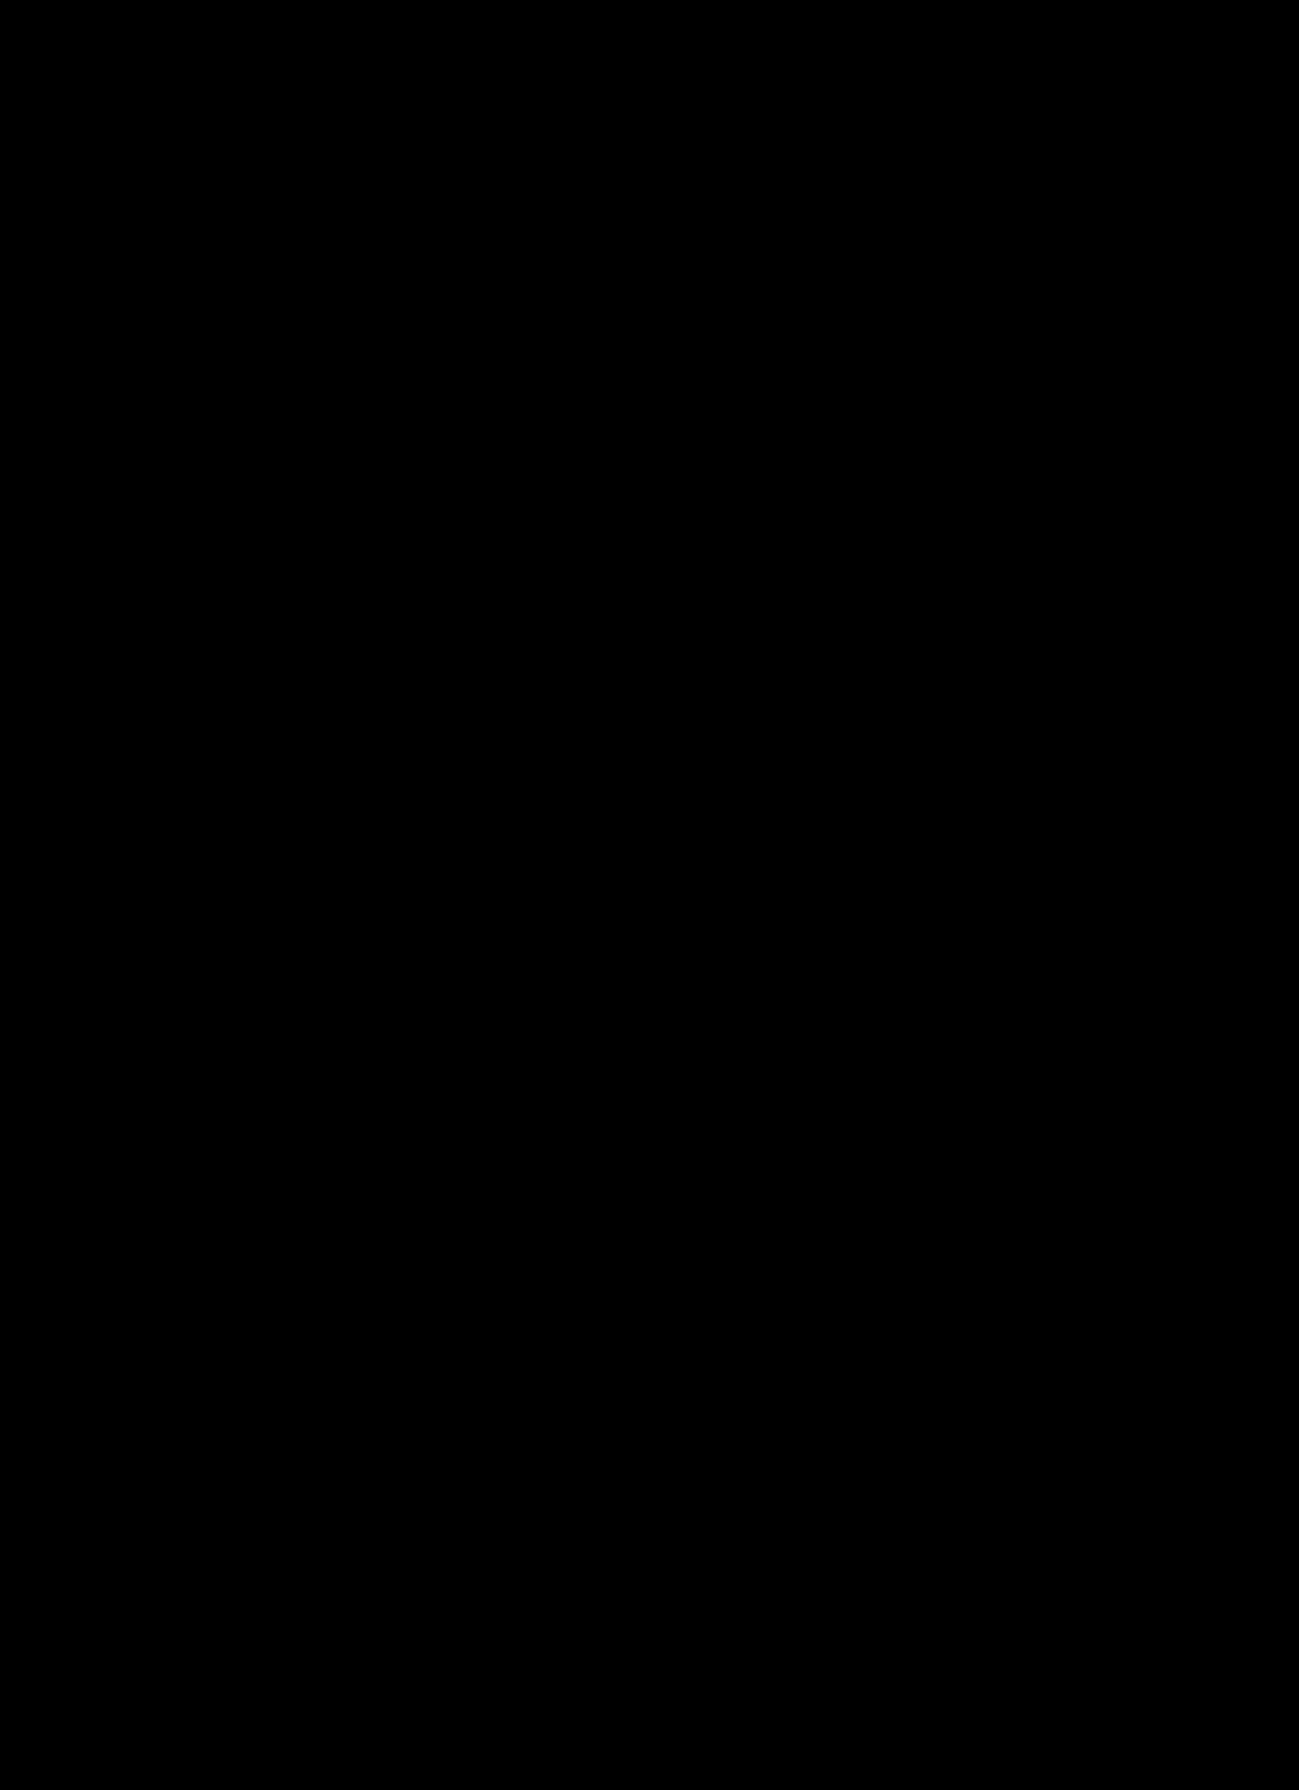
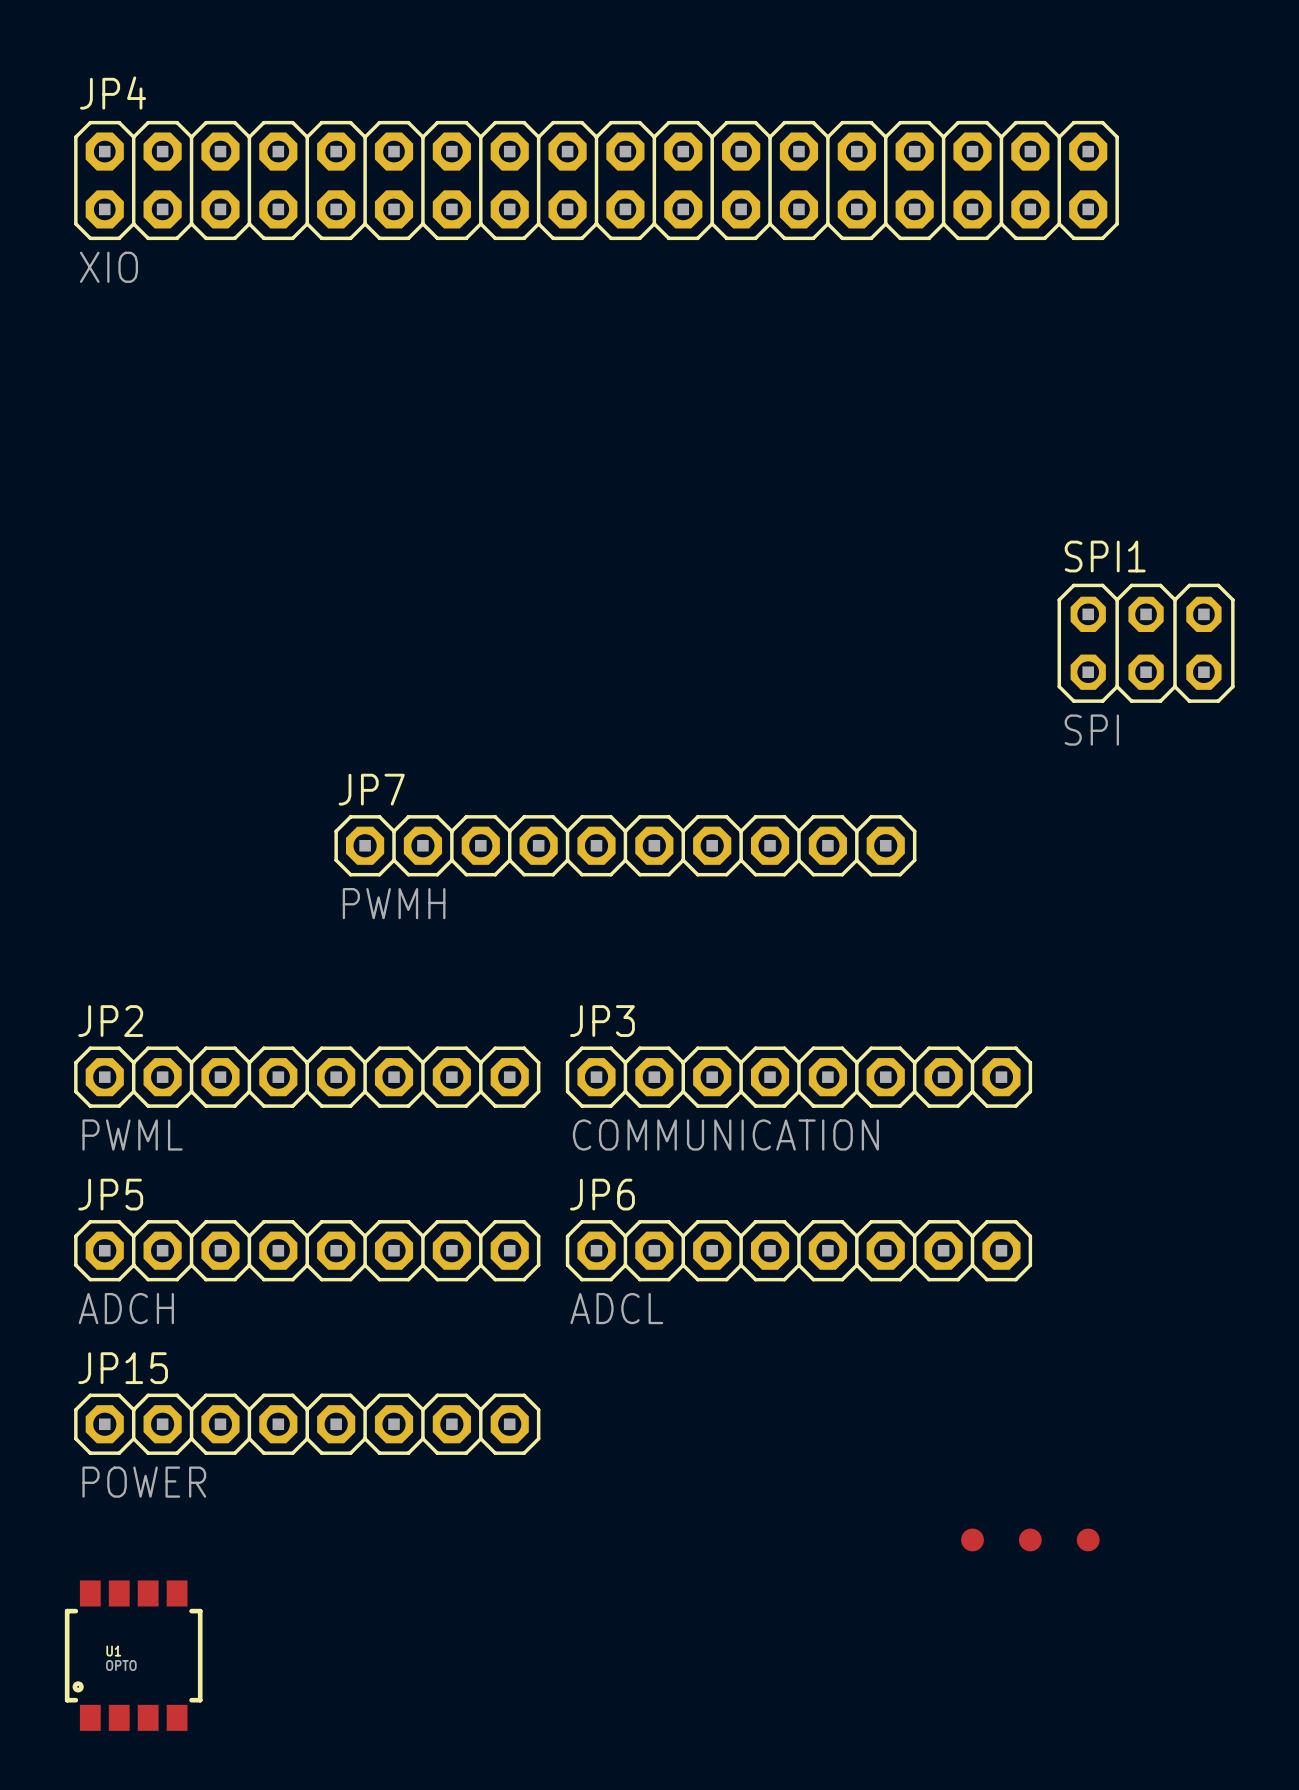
JP4: none -> XIO (596, 180)
SPI1: none -> SPI (1146, 643)
JP7: none -> PWMH (625, 845)
JP2: none -> PWML (307, 1077)
JP3: none -> COMMUNICATION (798, 1077)
JP5: none -> ADCH (307, 1250)
JP6: none -> ADCL (798, 1250)
JP15: none -> POWER (307, 1424)
part: none -> (972, 1539)
part: none -> (1030, 1539)
part: none -> (1088, 1539)
U1: none -> OPTO (133, 1655)

